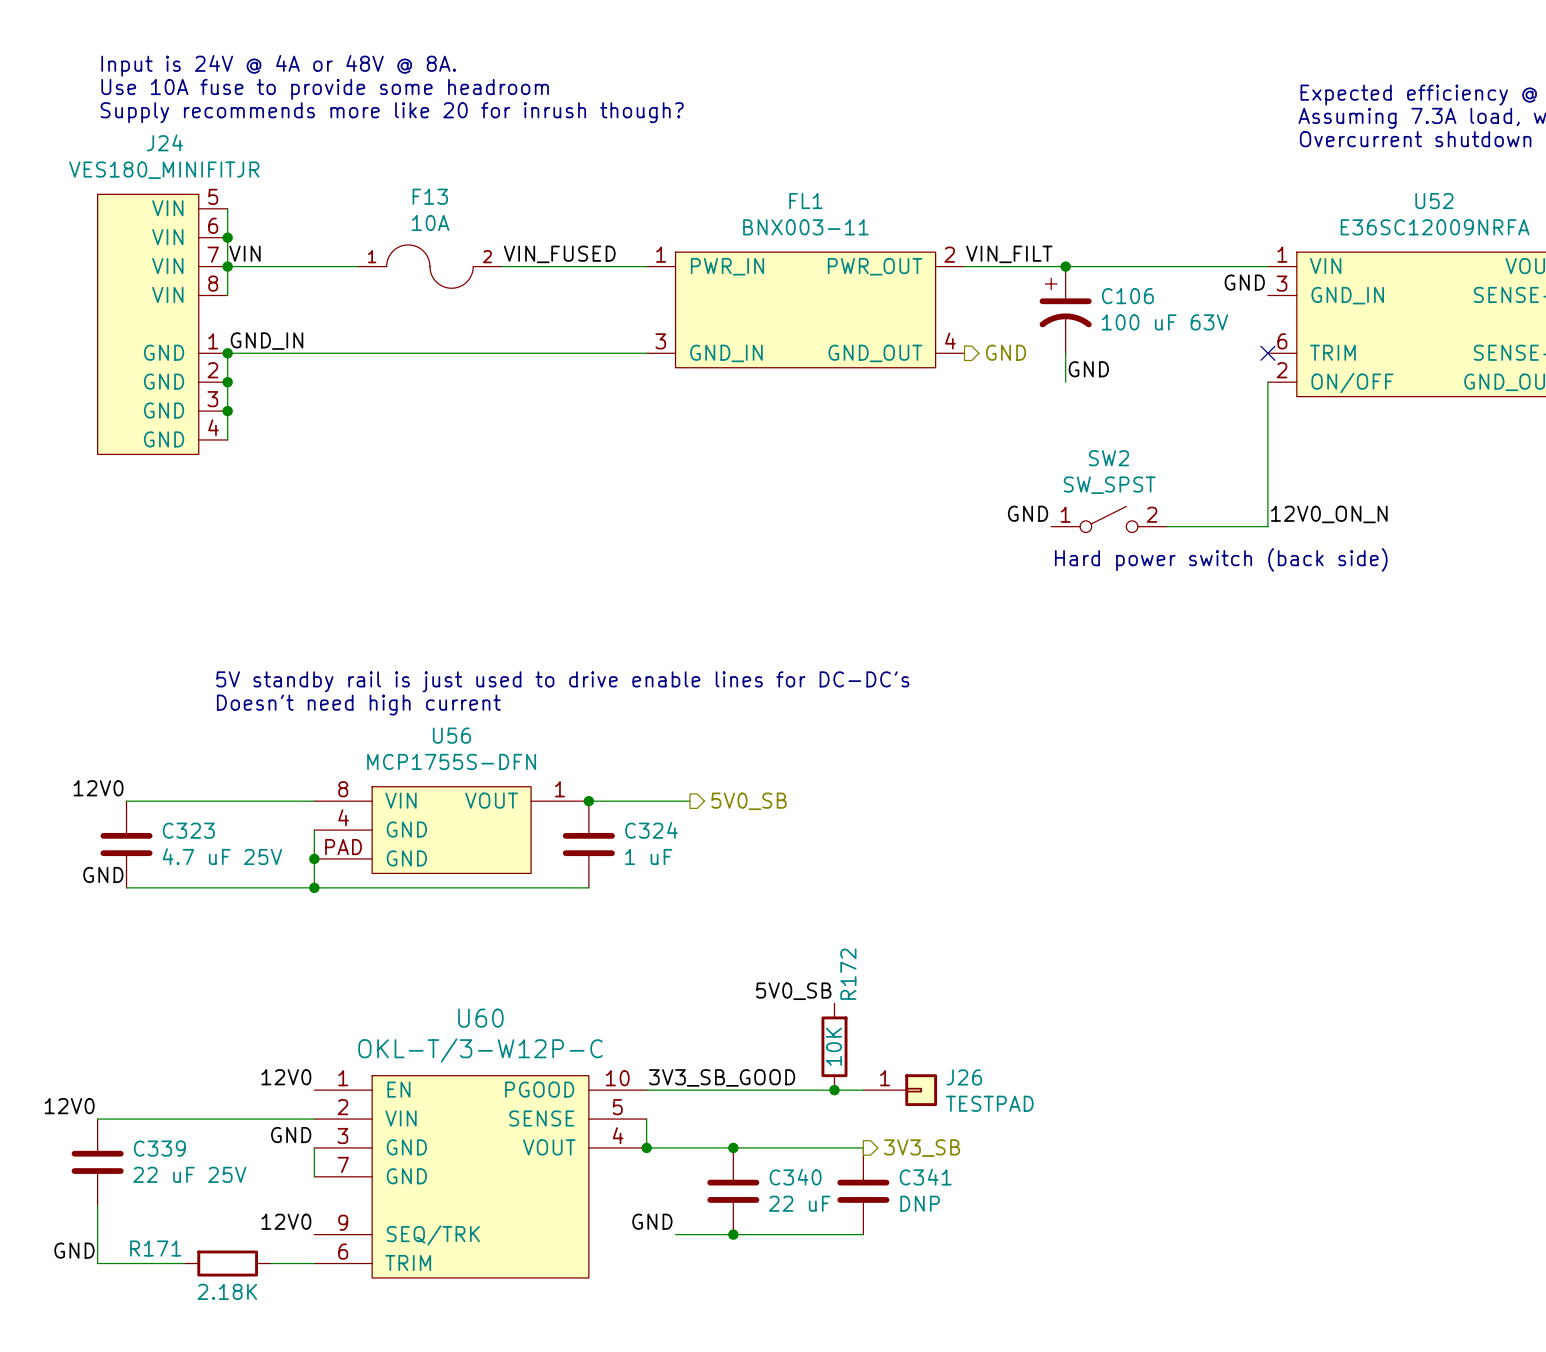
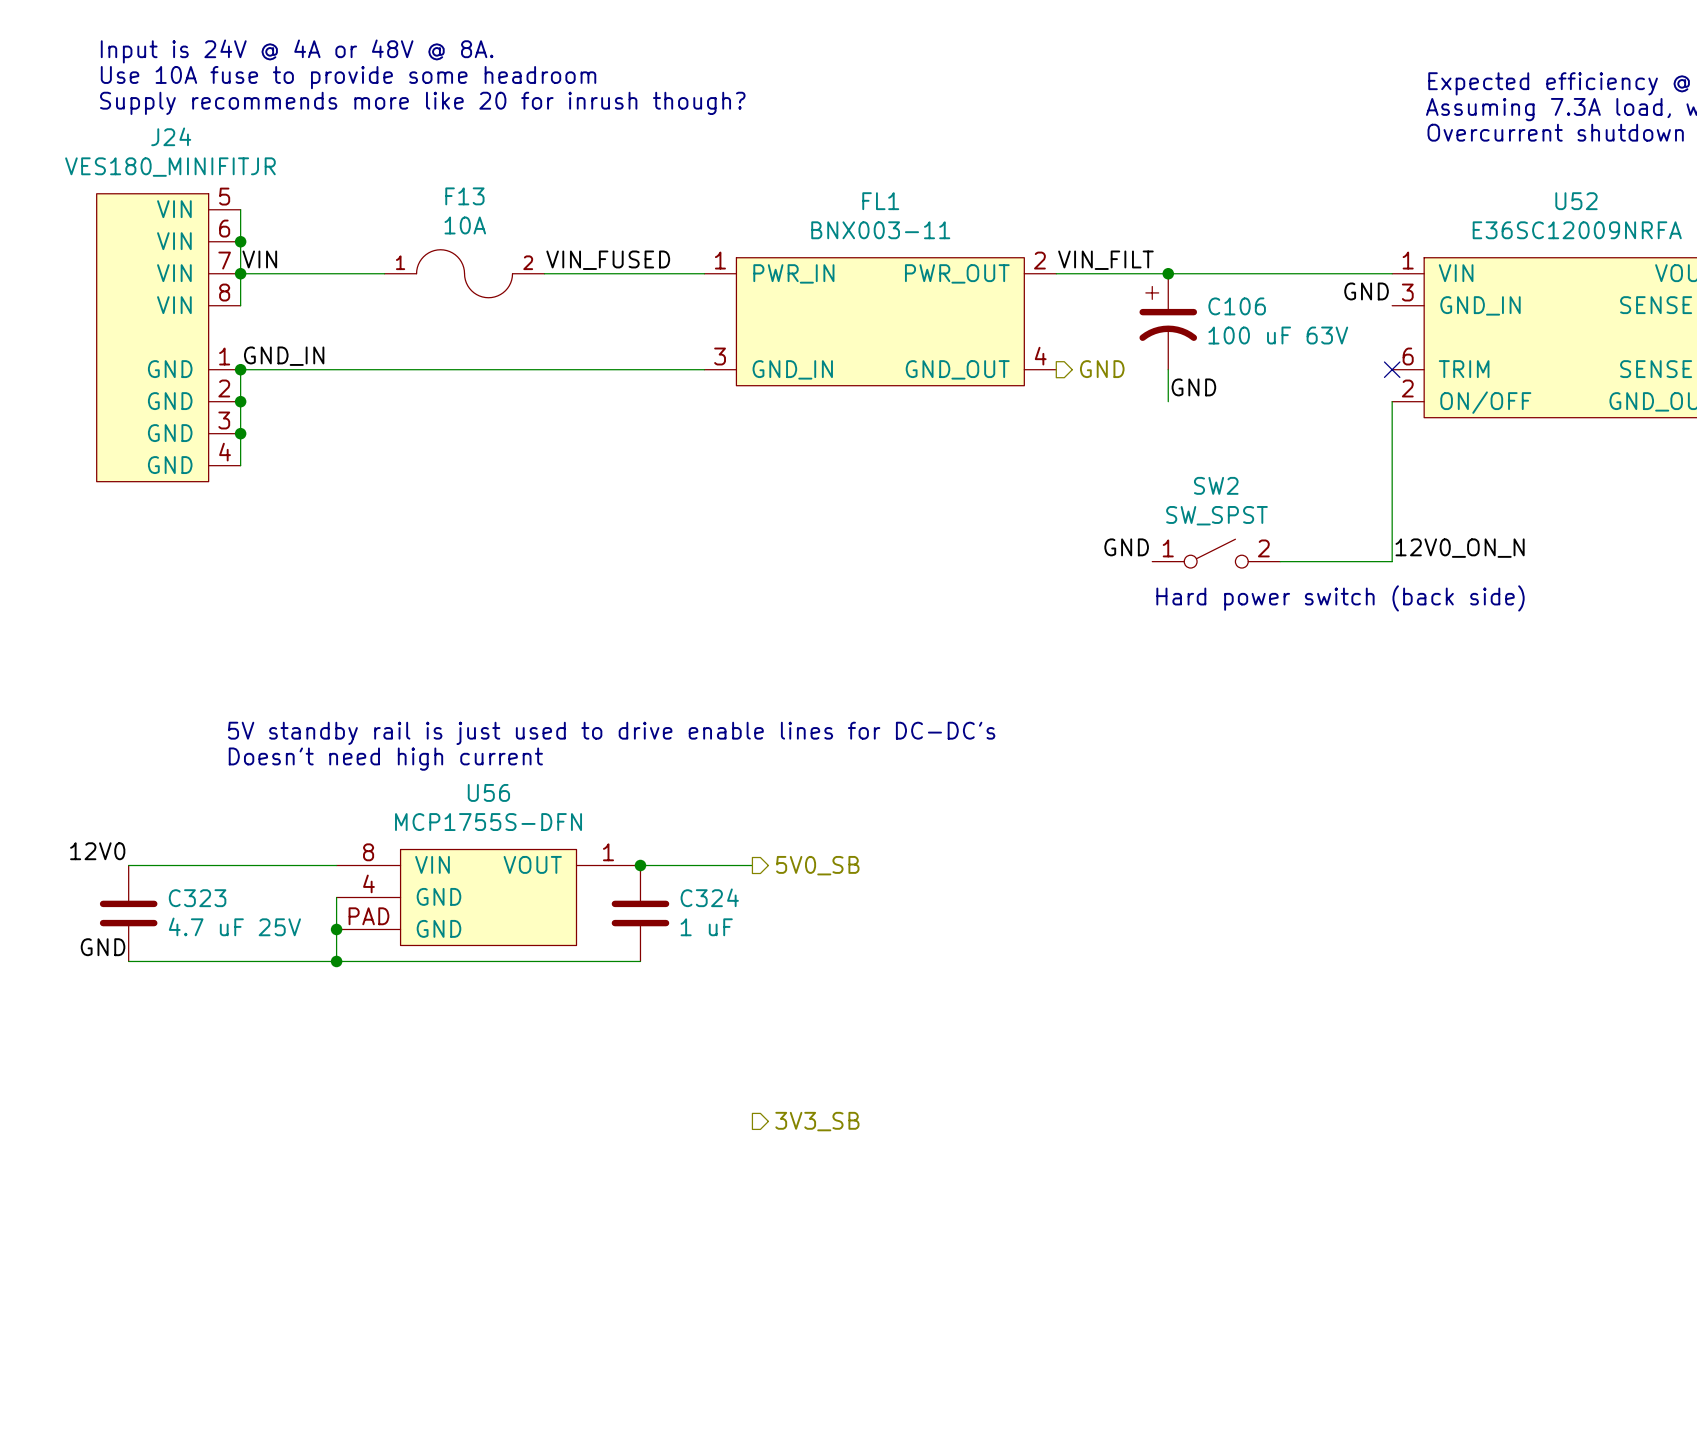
label: 5V0_SB (793, 991) -> none
R172: 10K (834, 1046) -> none
label: 12V0 (286, 1077) -> none
label: 3V3_SB_GOOD (722, 1077) -> none
wire: (646, 1090) (863, 1090) -> none
junction: (834, 1090) -> none
J26: TESTPAD (900, 1090) -> none
label: 12V0 (69, 1106) -> none
wire: (97, 1119) (314, 1119) -> none
wire: (646, 1119) (646, 1147) (863, 1147) -> none
label: GND (291, 1135) -> none
wire: (314, 1147) (314, 1176) -> none
junction: (646, 1147) -> none
junction: (733, 1147) -> none
hierarchical label position: 3V3_SB (922, 1148) -> 3V3_SB (817, 1121)
C339: 22 uF 25V (97, 1162) -> none
U60: OKL-T/3-W12P-C (480, 1176) -> none
C340: 22 uF (733, 1191) -> none
C341: DNP (863, 1191) -> none
wire: (97, 1205) (97, 1263) (184, 1263) -> none
label: 12V0 (286, 1221) -> none
label: GND (652, 1221) -> none
wire: (675, 1234) (863, 1234) -> none
junction: (733, 1234) -> none
label: GND (74, 1250) -> none
R171: 2.18K (227, 1263) -> none
wire: (271, 1263) (314, 1263) -> none

